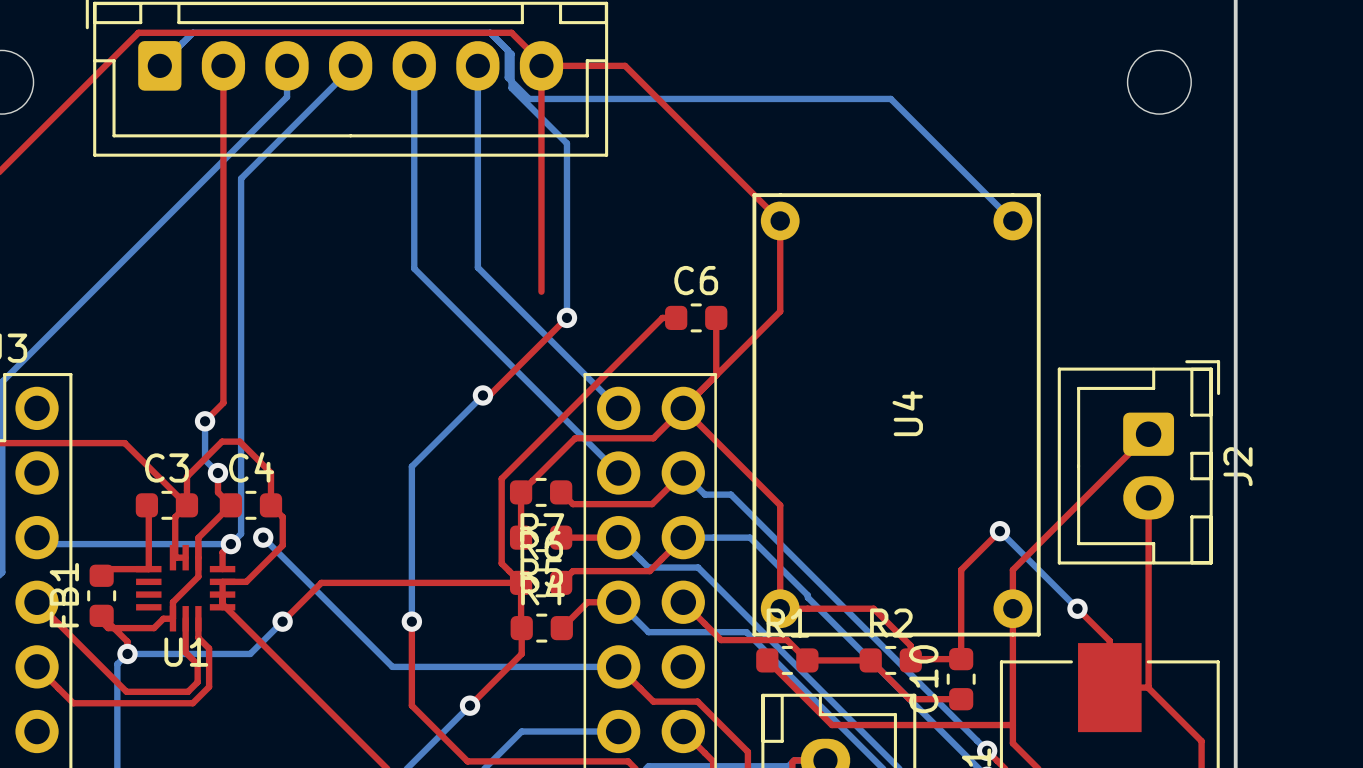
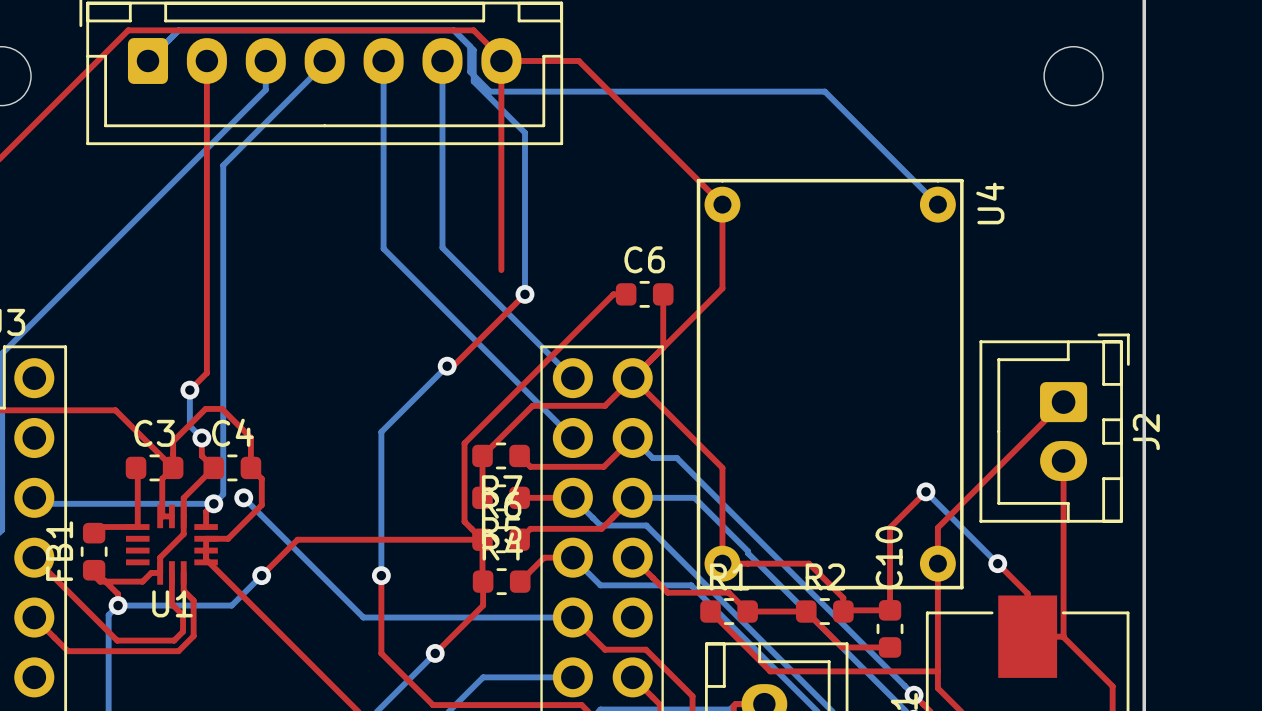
U4 name position: U4 (907, 413) -> U4 (990, 203)
C10 name position: C10 (923, 679) -> C10 (889, 557)

